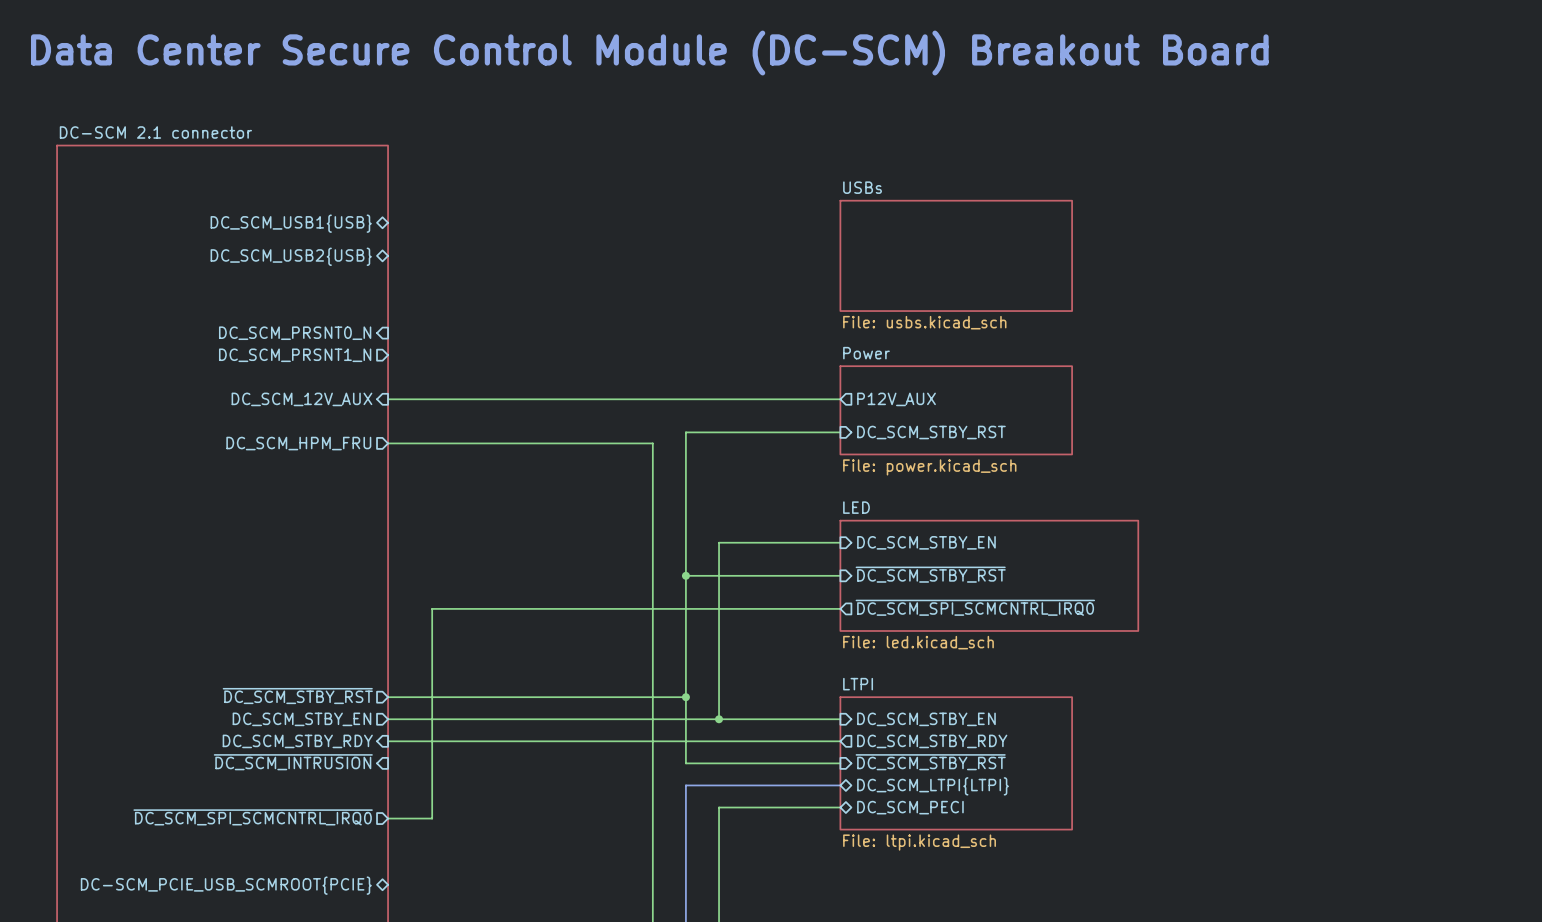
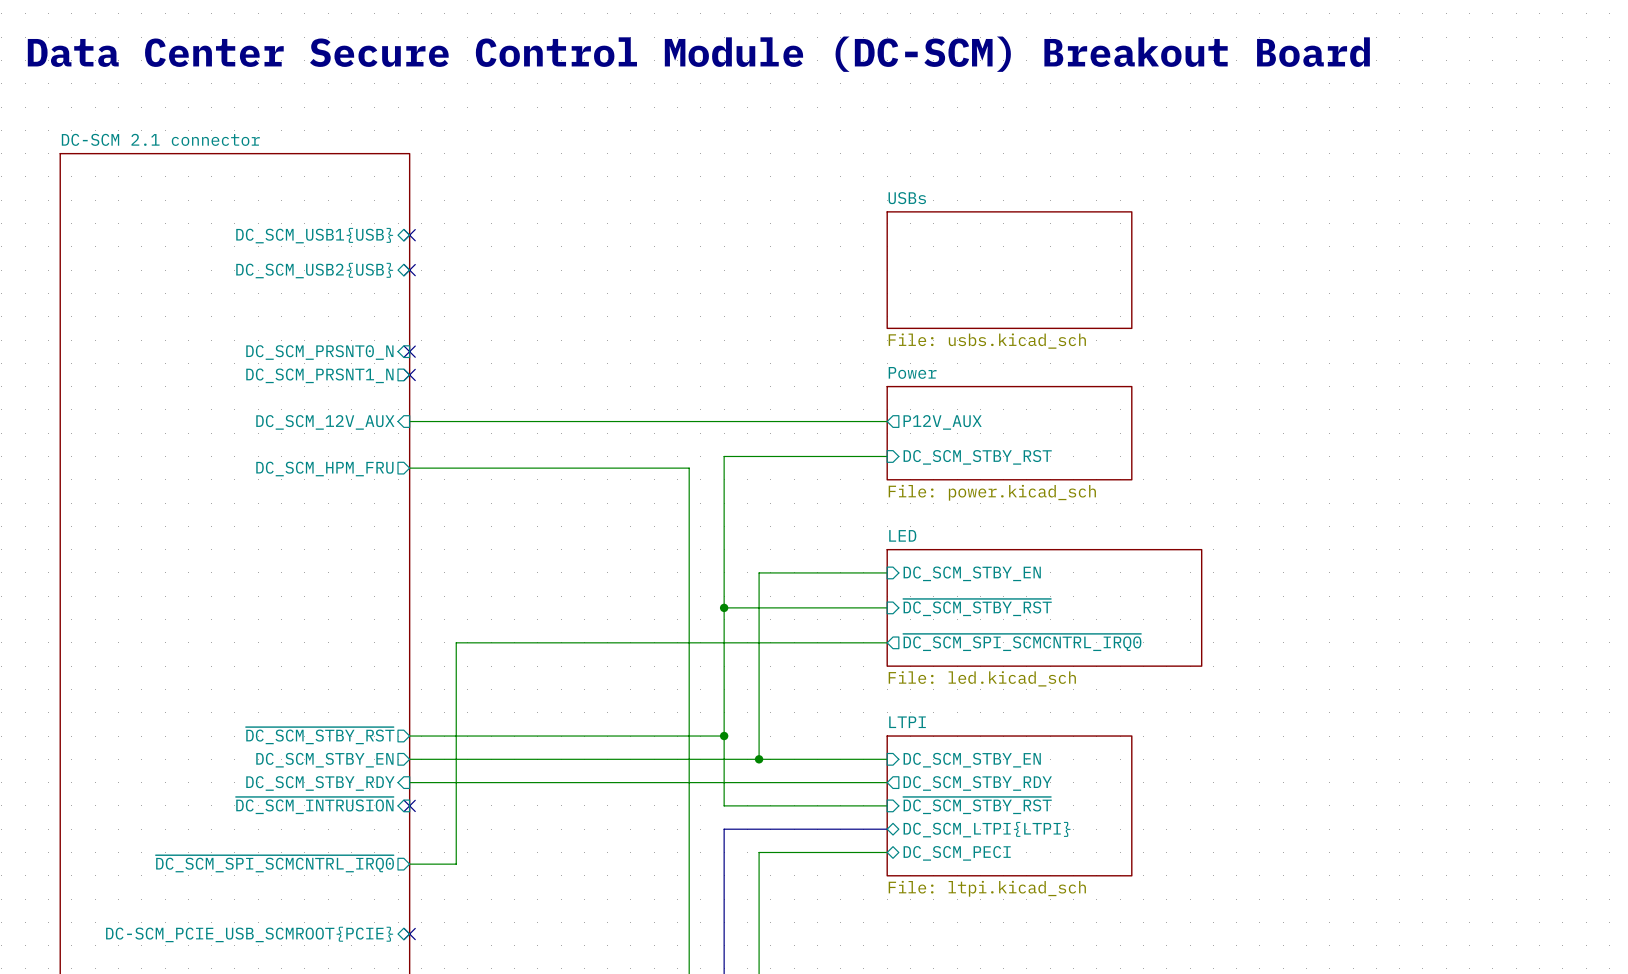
no-connect mark: none -> (409, 235)
no-connect mark: none -> (409, 270)
no-connect mark: none -> (409, 351)
no-connect mark: none -> (409, 374)
no-connect mark: none -> (409, 805)
no-connect mark: none -> (409, 934)

